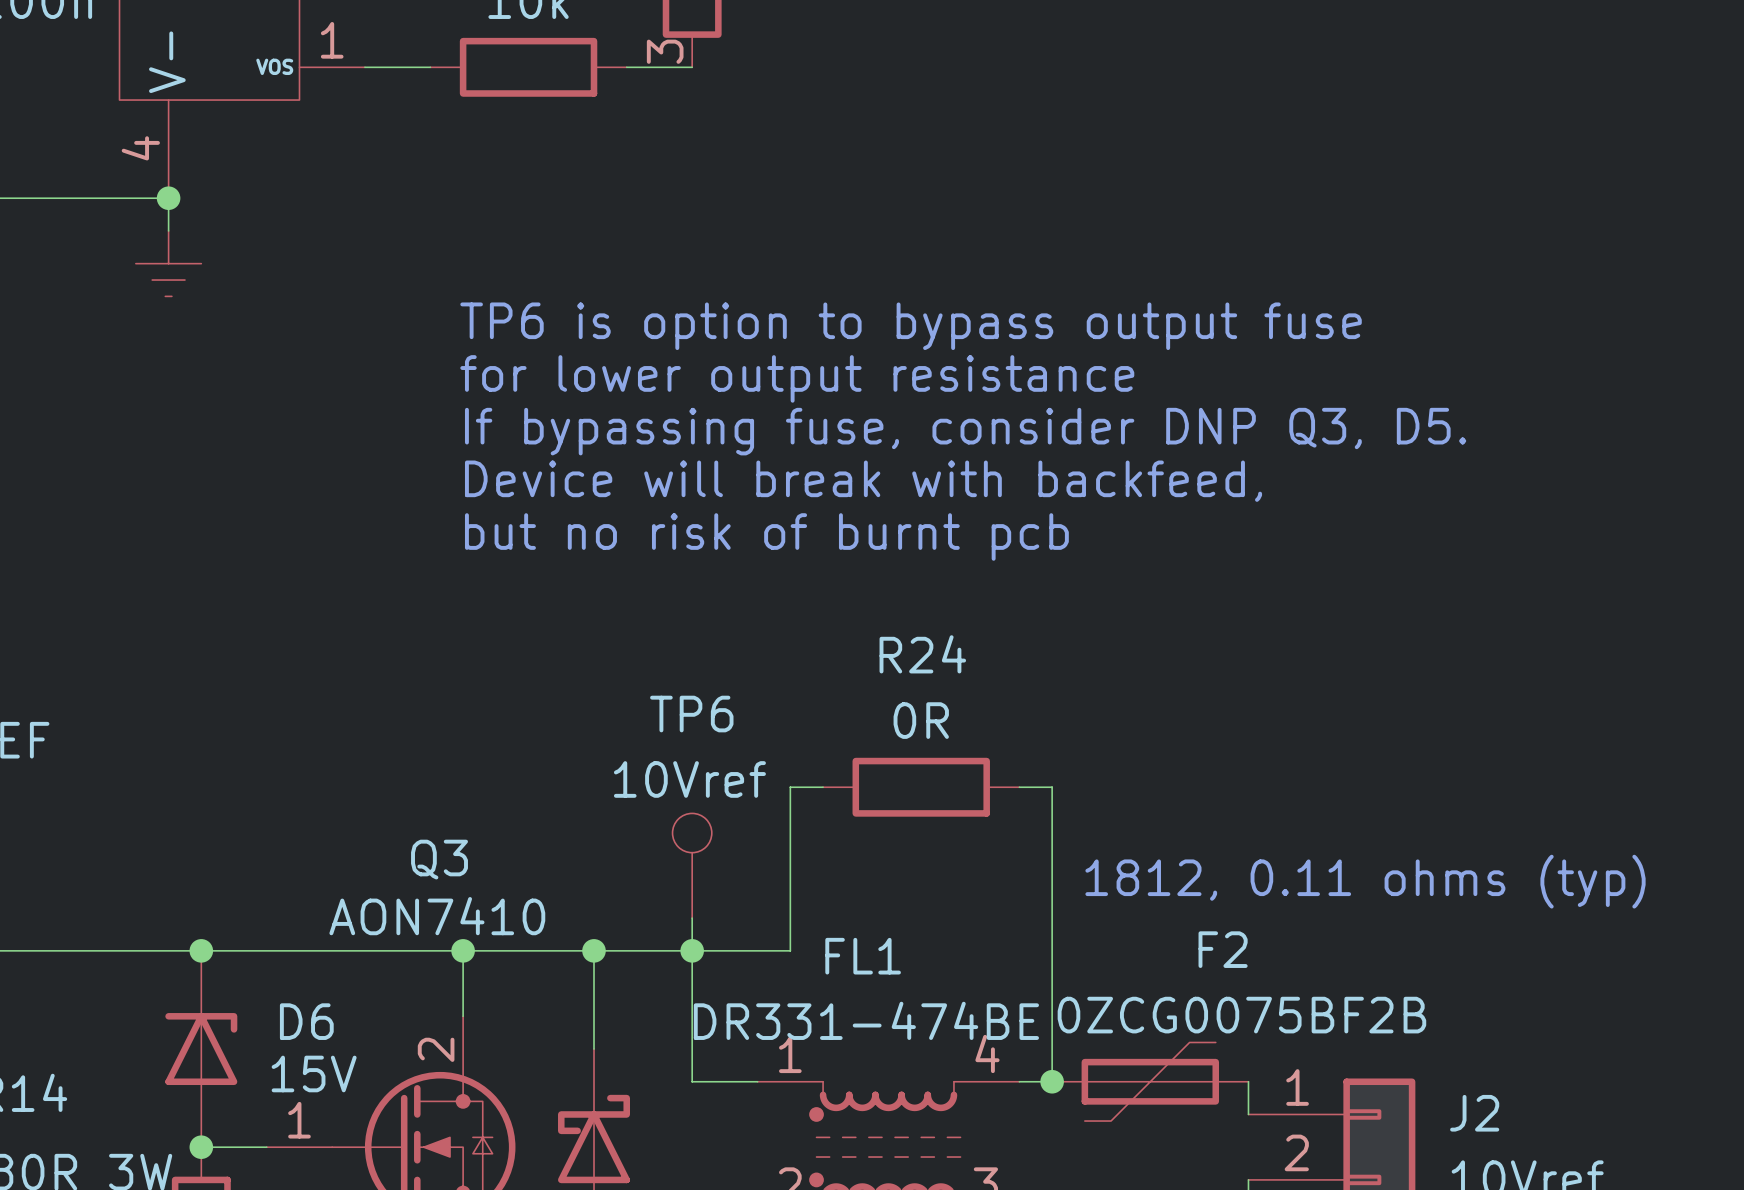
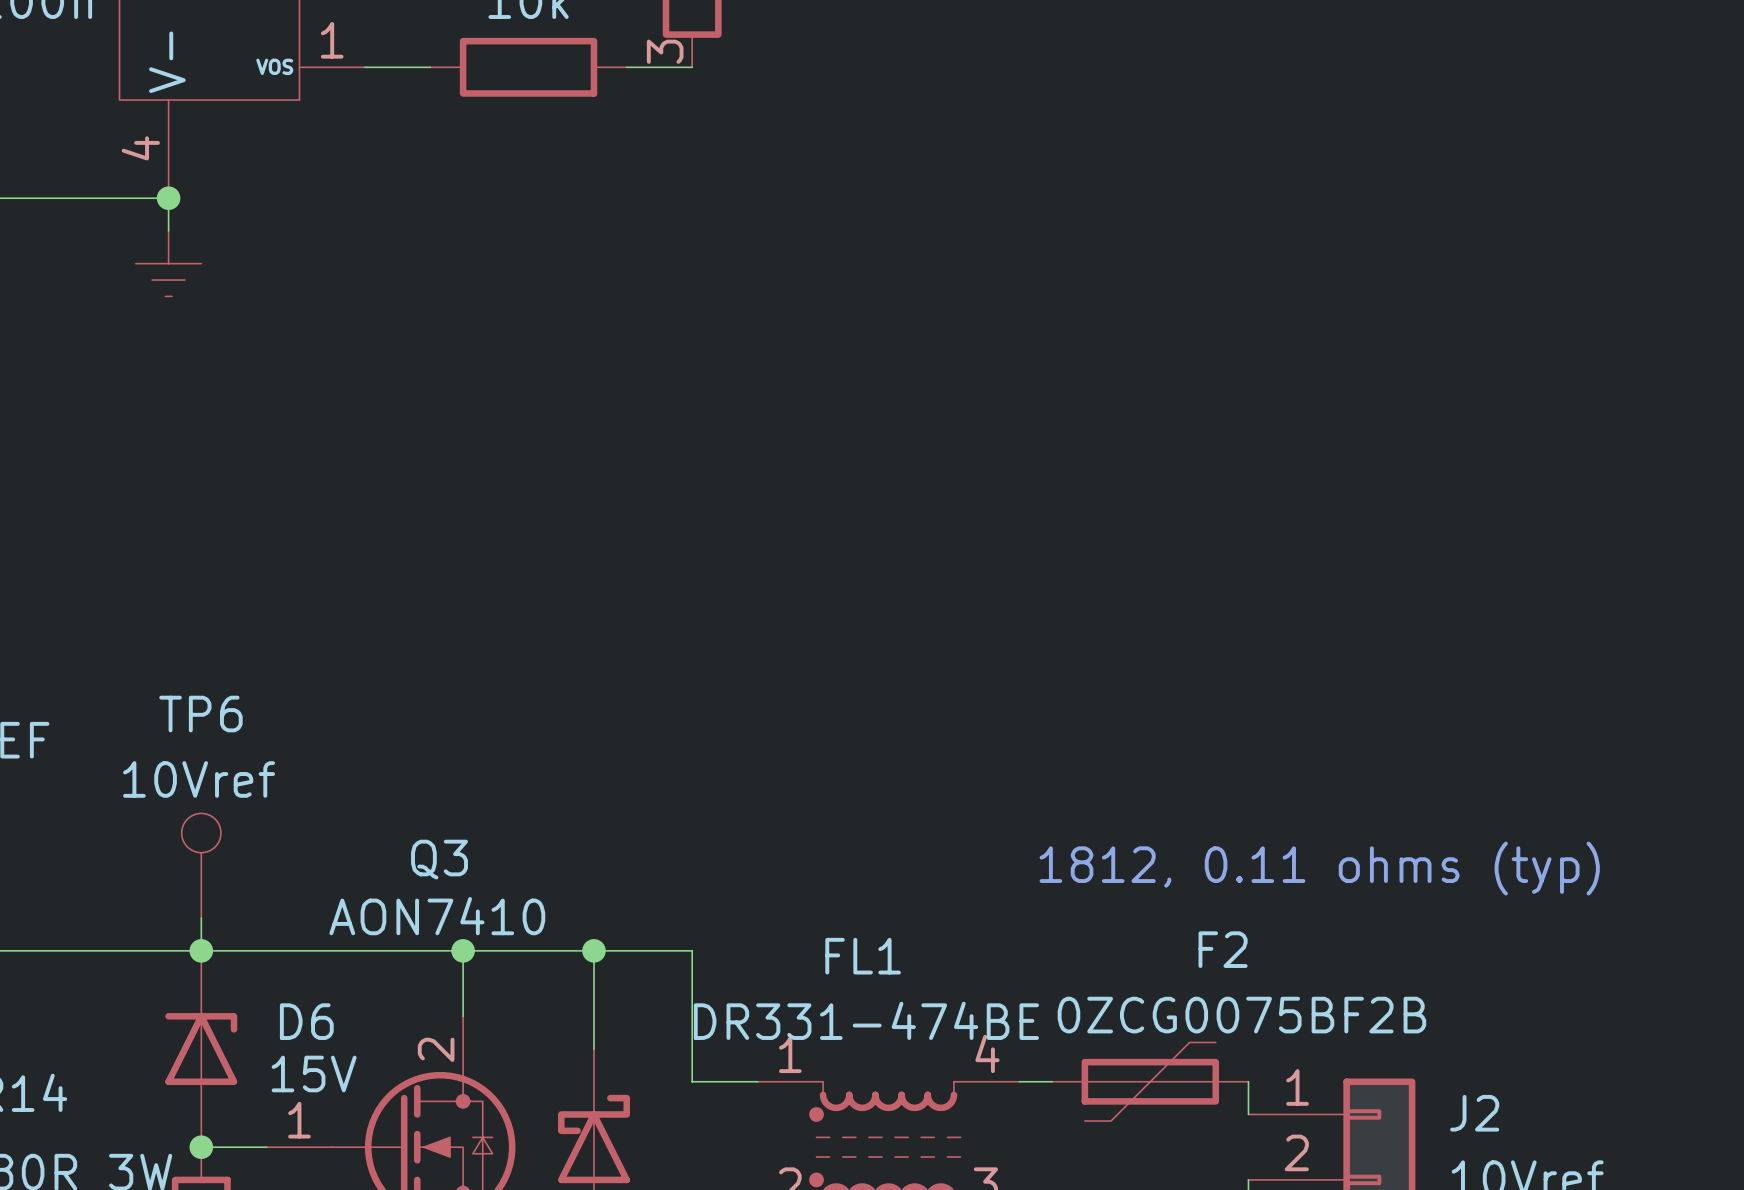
text: TP6 is option to bypass output fuse (911, 326) -> none
text: for lower output resistance (797, 378) -> none
text: If bypassing fuse, consider DNP Q3, D5. (965, 431) -> none
text: Device will break with backfeed, (863, 481) -> none
text: but no risk of burnt pcb (766, 536) -> none
wire: (823, 787) (790, 787) (790, 950) (692, 950) (692, 918) -> none
R24: 0R (921, 787) -> none
wire: (1019, 787) (1052, 787) (1052, 1081) -> none
TP6 position: (692, 865) -> (201, 865)
text position: 1812, 0.11 ohms (typ) (1365, 881) -> 1812, 0.11 ohms (typ) (1319, 868)
wire: none -> (201, 918) (201, 950)
junction: (692, 950) -> none
junction: (1052, 1081) -> none

